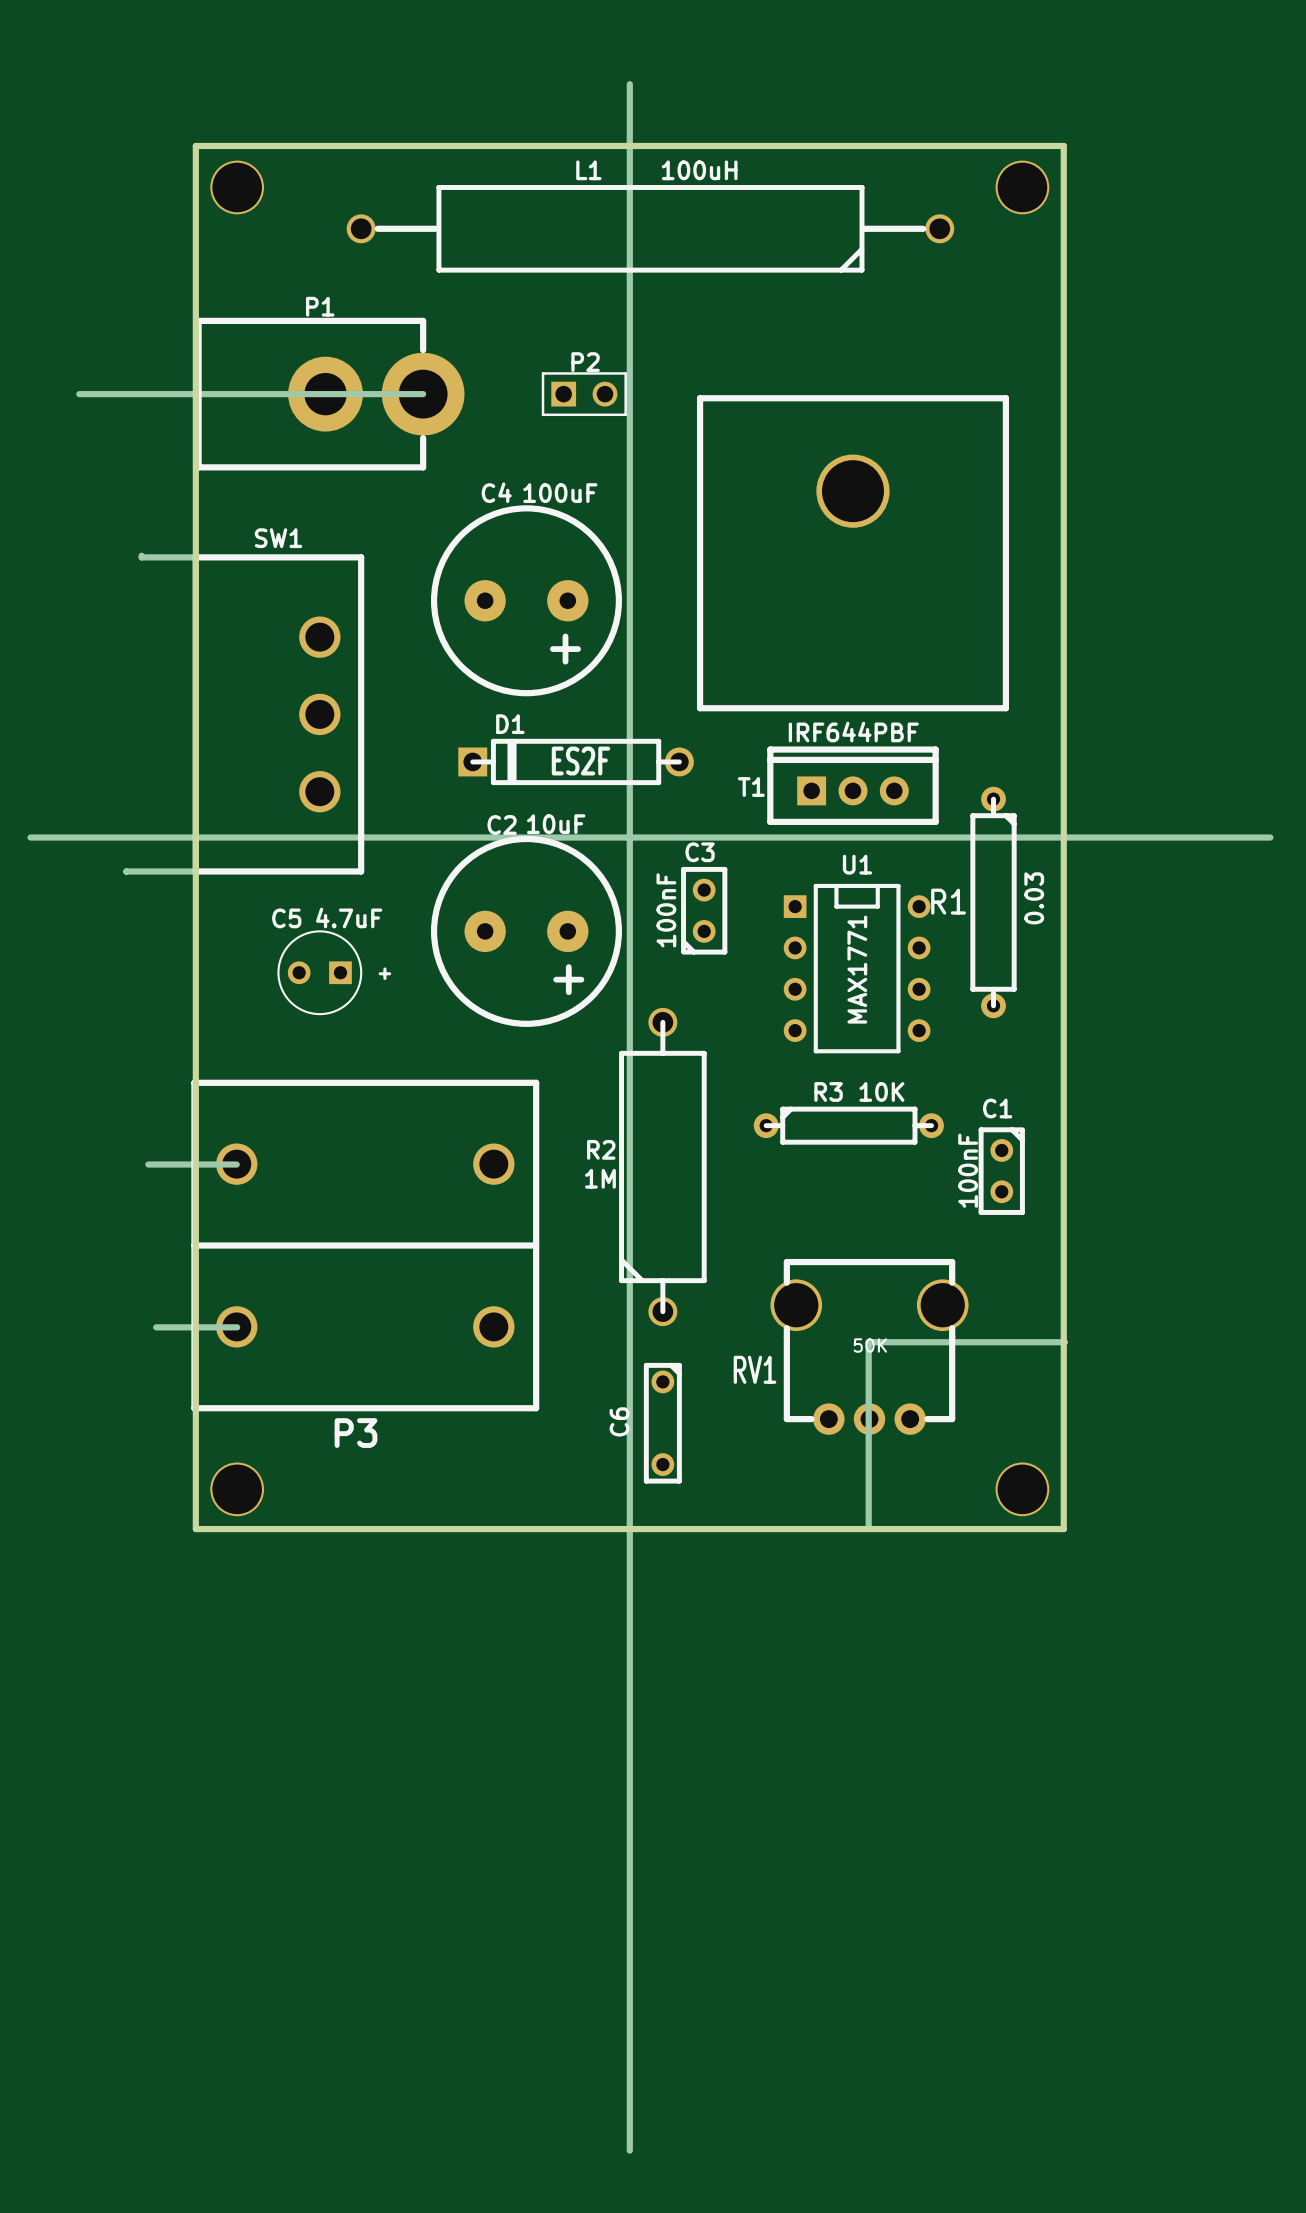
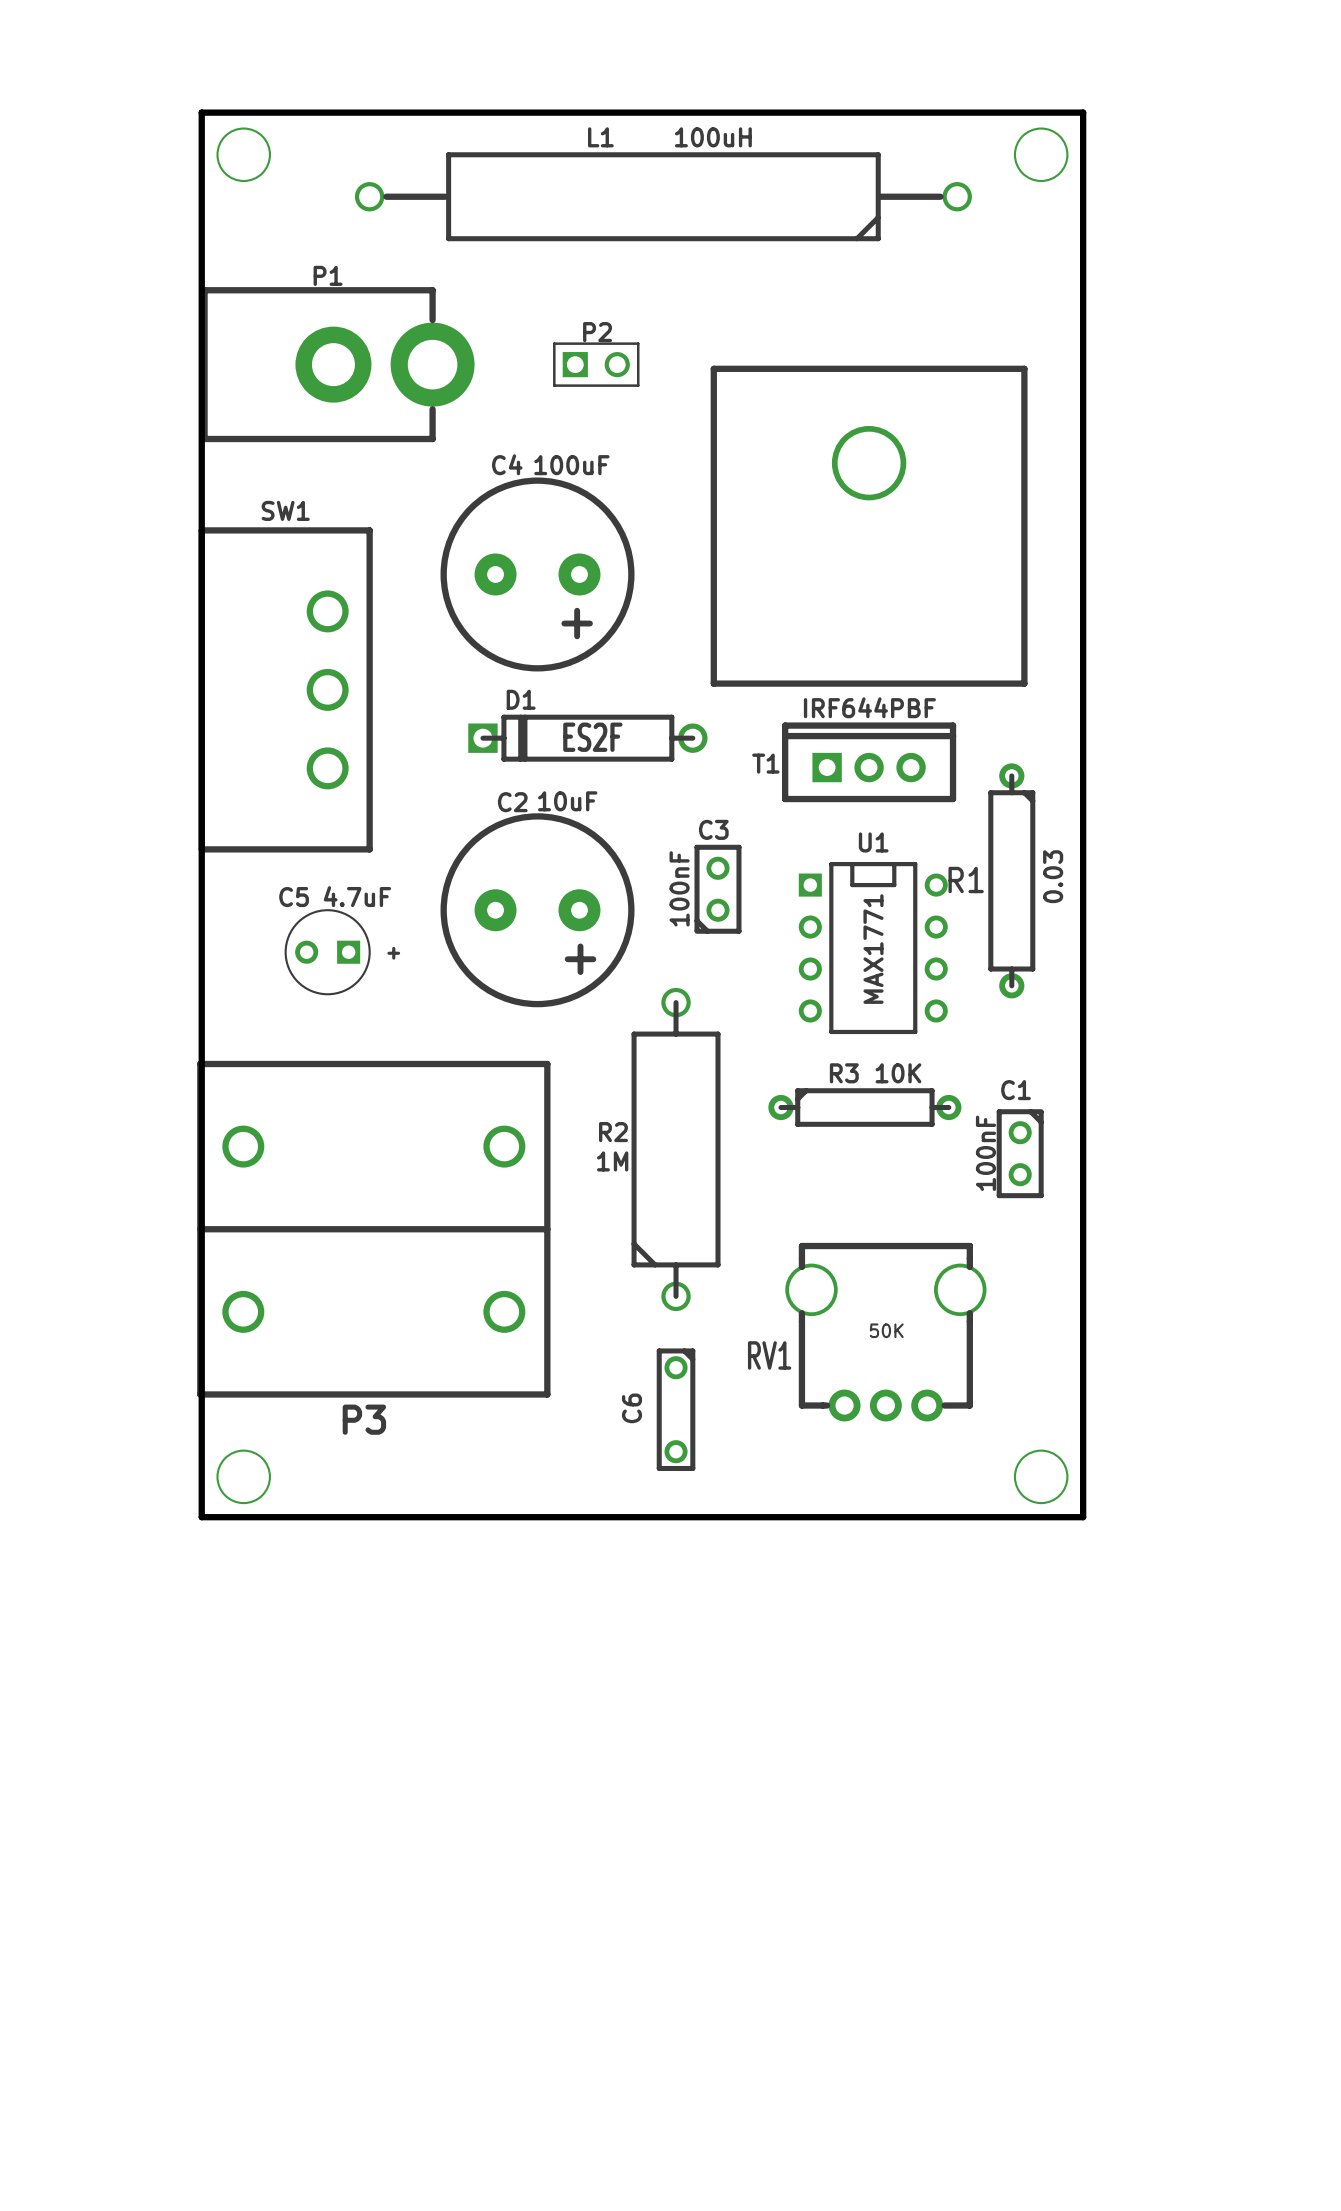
line: (629, 84) (629, 2150) -> none
line: (79, 394) (423, 394) -> none
line: (141, 555) (141, 557) (196, 557) -> none
line: (30, 837) (1270, 837) -> none
line: (196, 871) (126, 871) -> none
line: (148, 1164) (236, 1164) -> none
line: (156, 1327) (237, 1327) -> none
line: (868, 1342) (1064, 1342) -> none
line: (868, 1343) (868, 1528) -> none

